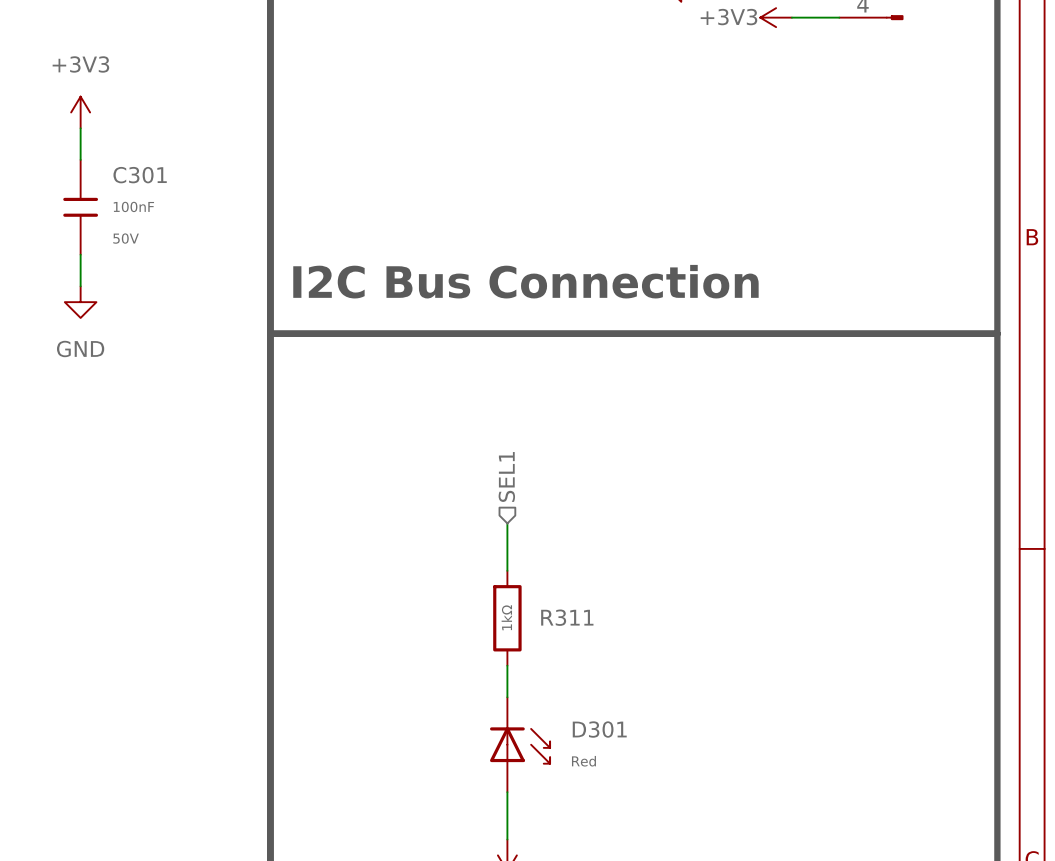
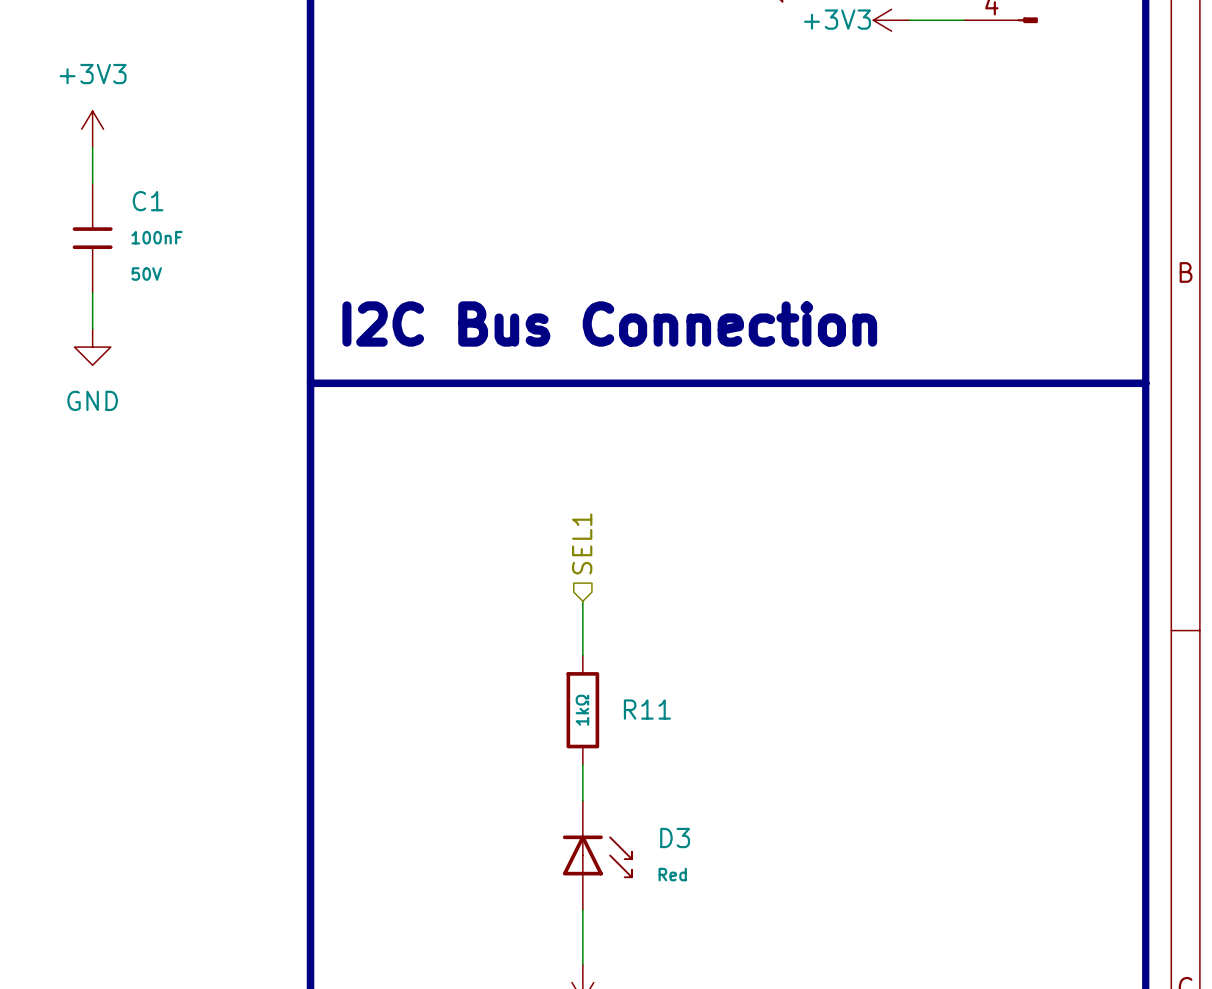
C301 name: C301 (140, 175) -> C1 (148, 201)
R311 name: R311 (567, 617) -> R11 (647, 709)
D301 name: D301 (599, 729) -> D3 (675, 838)

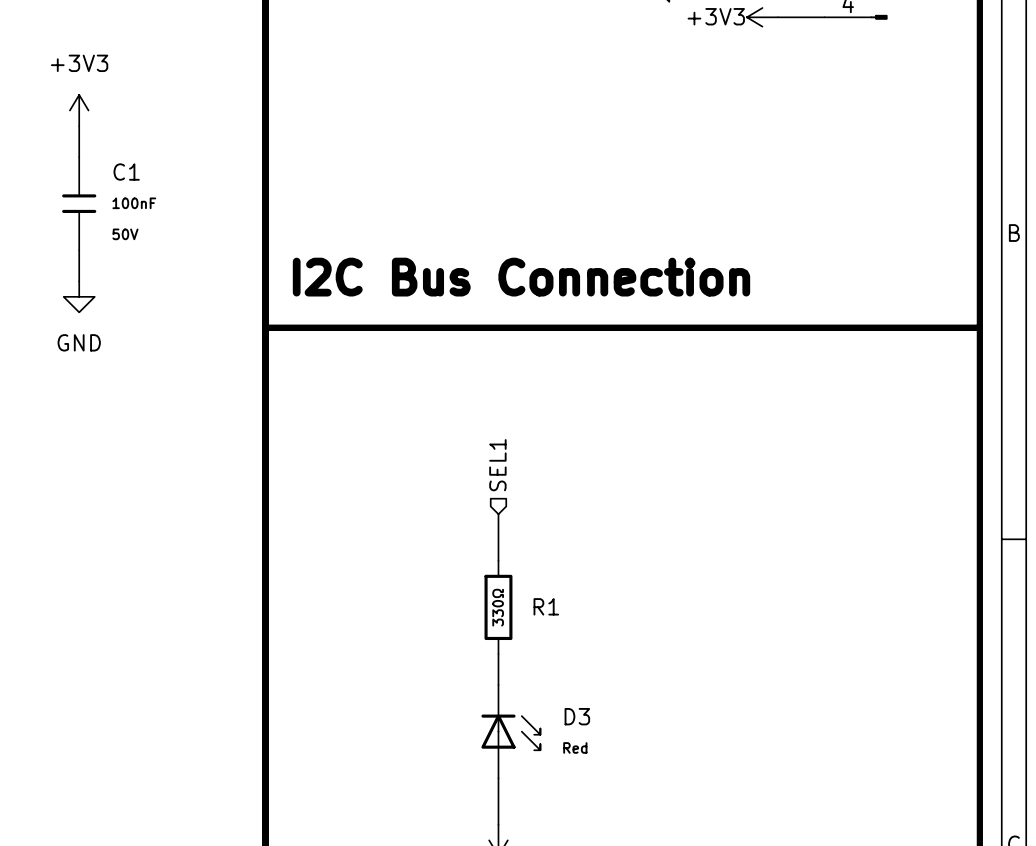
R11 name: R11 (647, 709) -> R1 (546, 606)
R11 value: 1kΩ (582, 710) -> 330Ω (498, 607)

